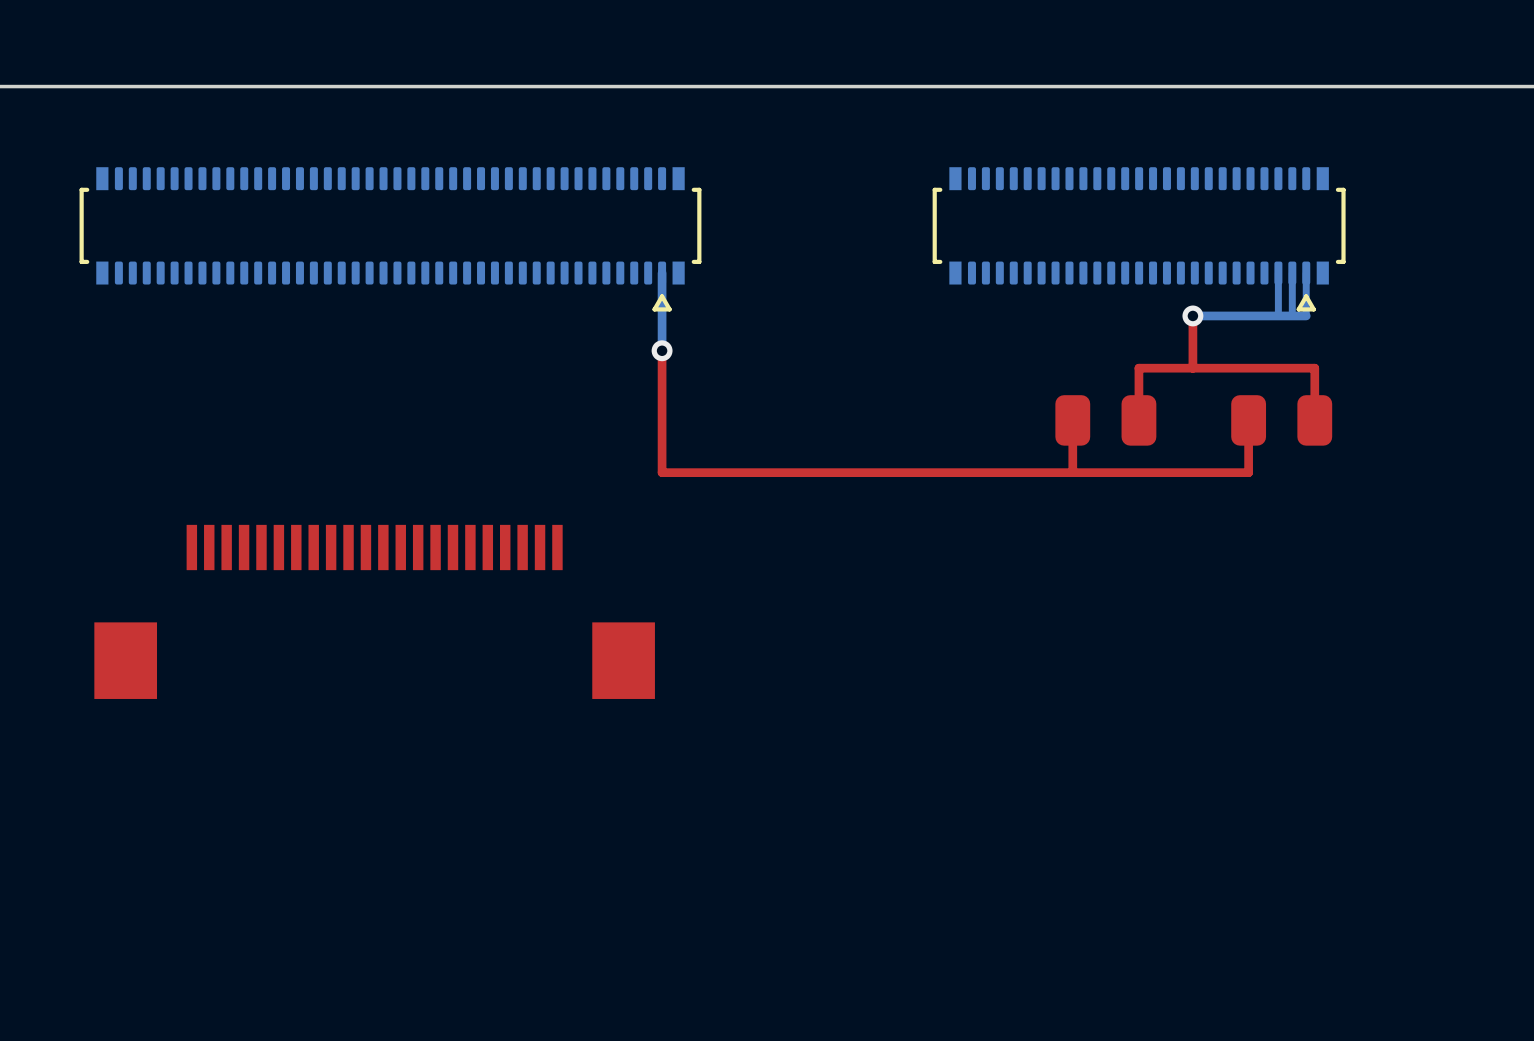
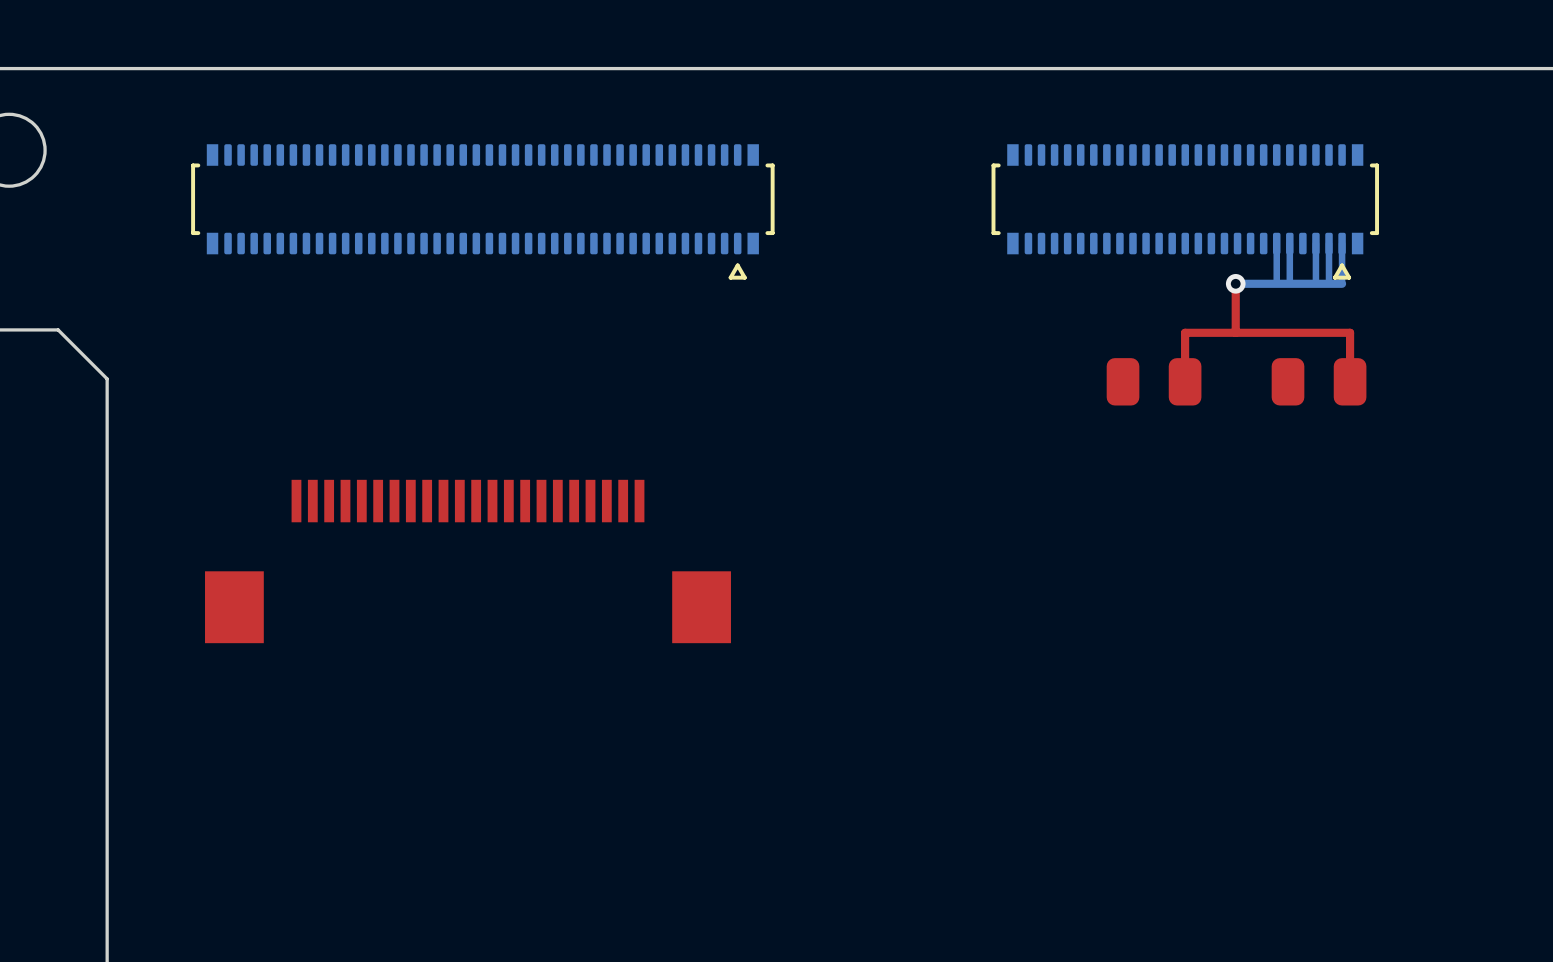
bottom track: (662, 273) (662, 350) -> none
bottom track: none -> (1276, 243) (1276, 283)
bottom track: none -> (1289, 243) (1289, 283)
top track: (662, 350) (662, 472) (1248, 472) (1248, 420) -> none
via: (662, 350) -> none
top track: (1072, 420) (1072, 472) -> none

